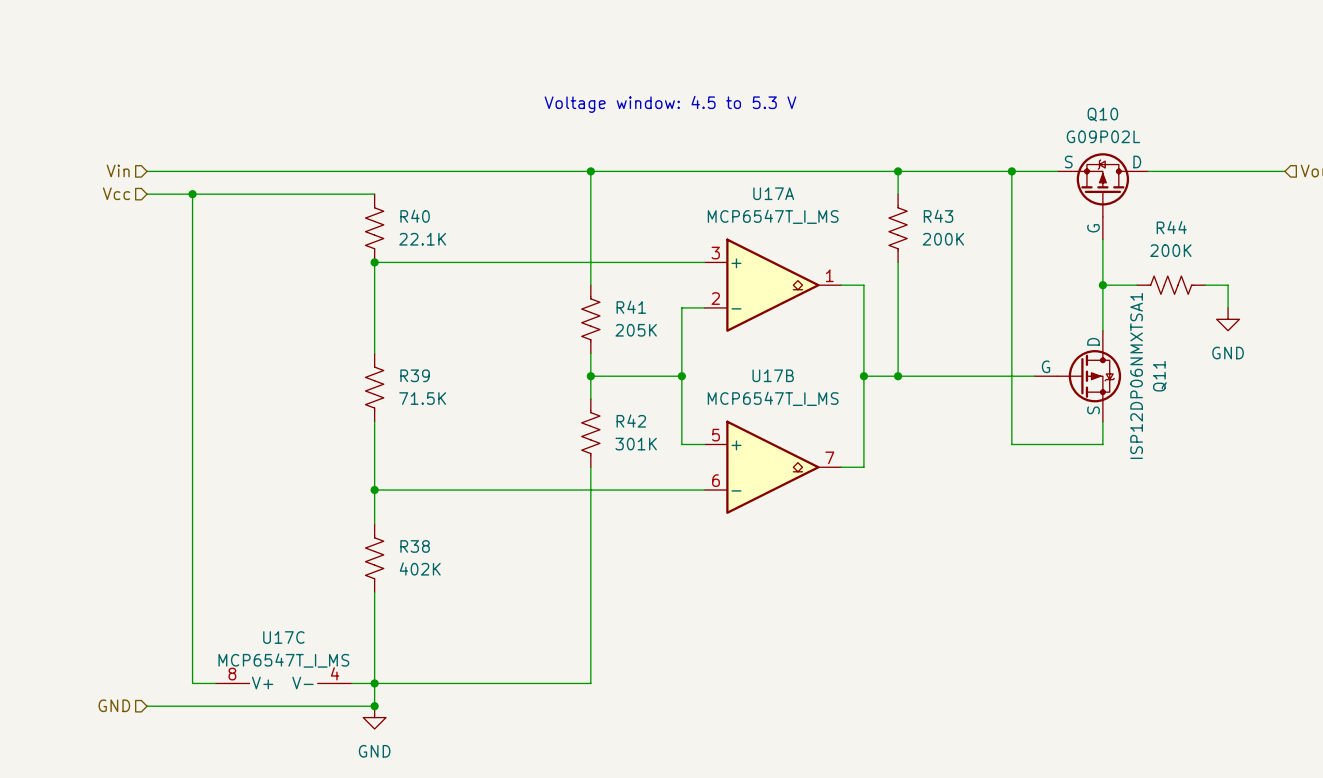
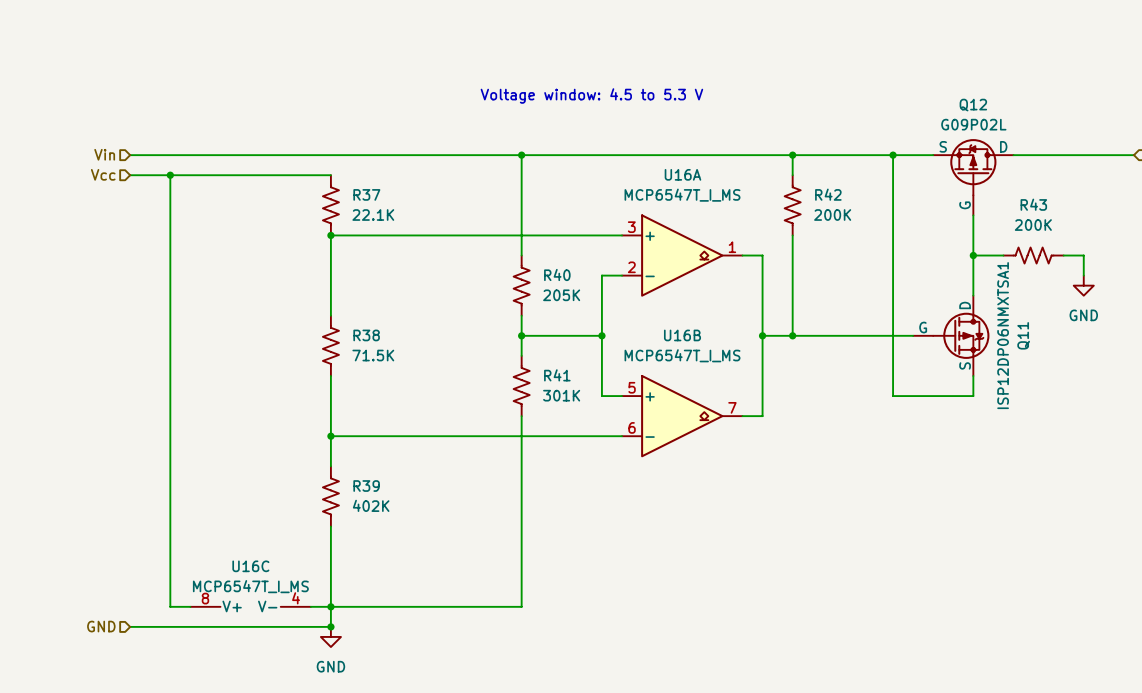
Q10 name: Q10 (1102, 114) -> Q12 (973, 105)
U17A name: U17A (773, 193) -> U16A (682, 174)
R40 name: R40 (415, 216) -> R37 (366, 194)
R43 name: R43 (938, 216) -> R42 (828, 194)
R44 name: R44 (1171, 227) -> R43 (1033, 204)
R41 name: R41 (631, 307) -> R40 (557, 274)
R39 name: R39 (415, 375) -> R38 (366, 335)
U17B name: U17B (773, 375) -> U16B (682, 335)
R42 name: R42 (631, 421) -> R41 (557, 375)
R38 name: R38 (415, 546) -> R39 (366, 486)
U17C name: U17C (283, 637) -> U16C (250, 566)

